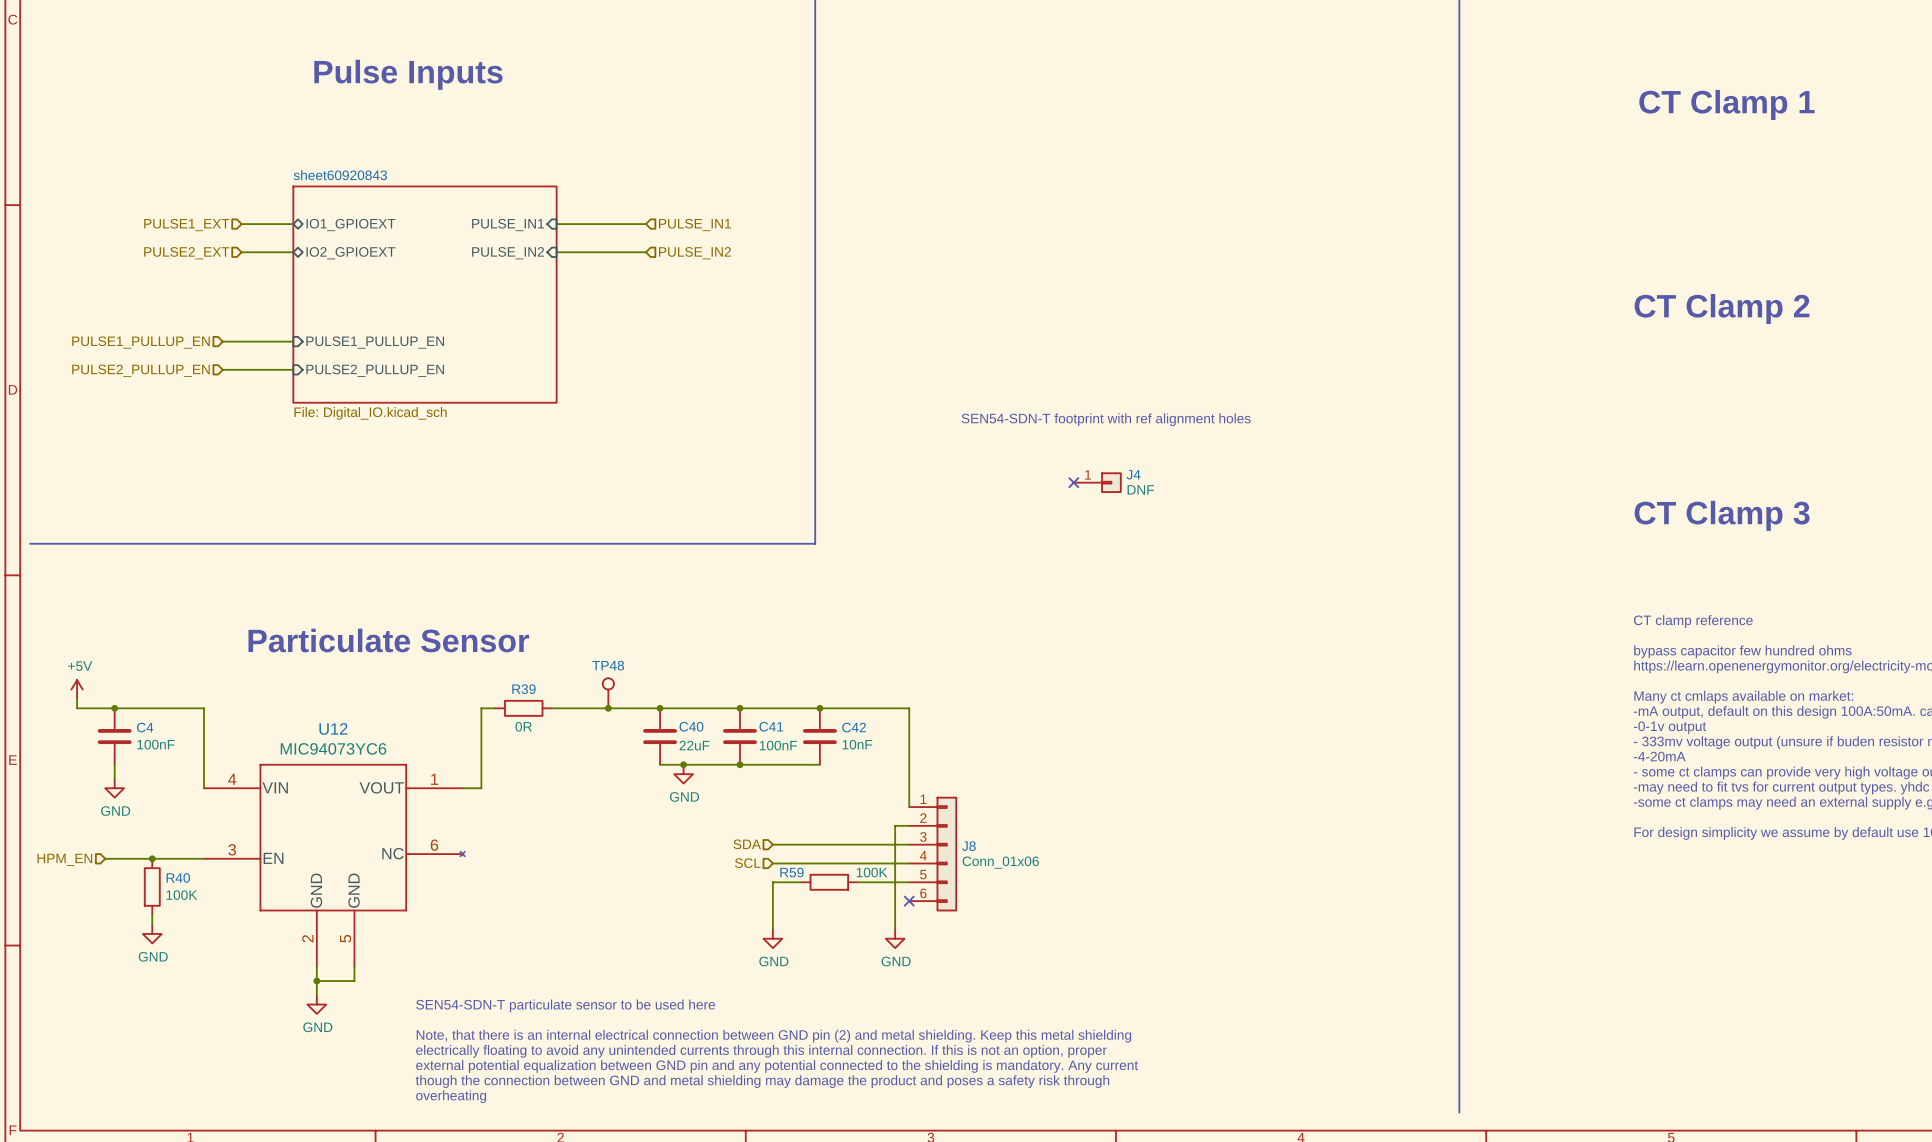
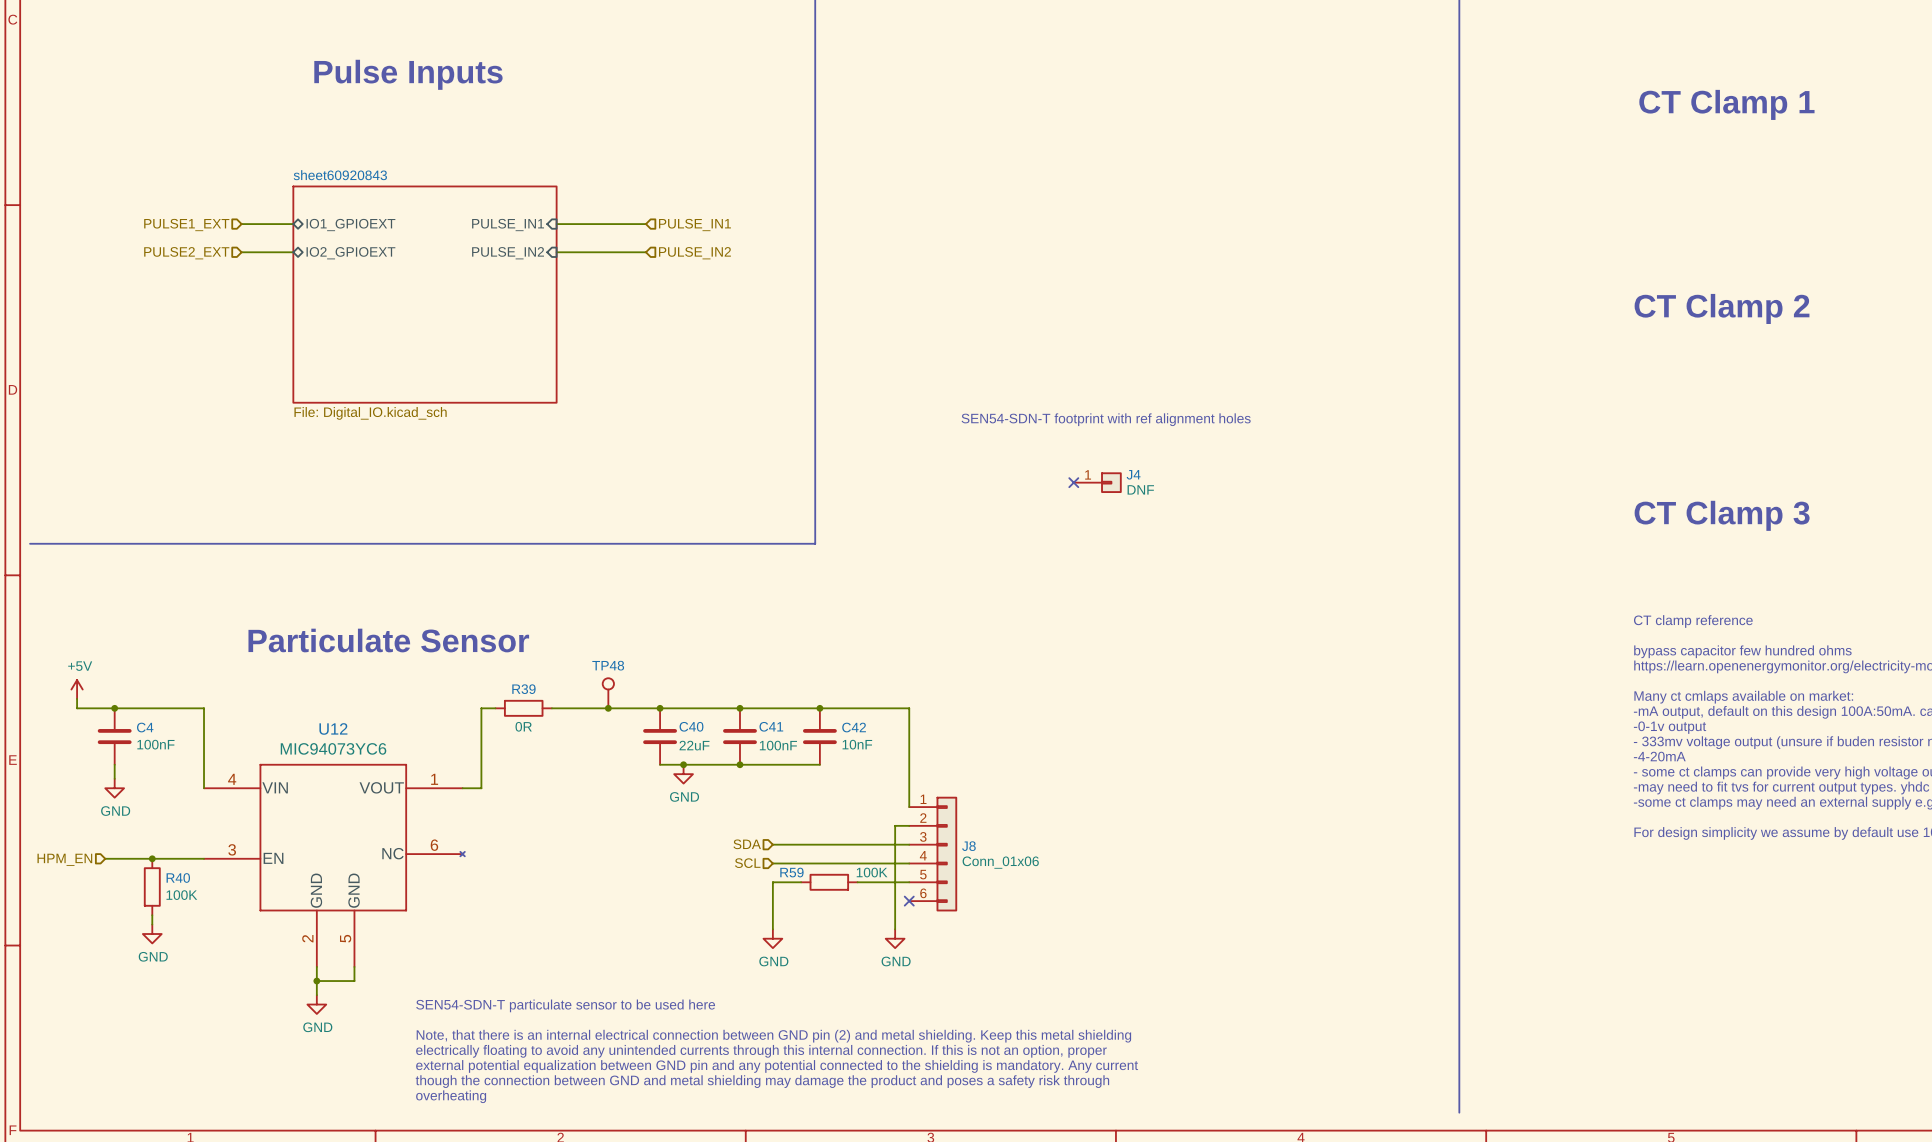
wire: (222, 341) (293, 341) -> none
hierarchical label: PULSE1_PULLUP_EN (140, 342) -> none
sheet pin: PULSE1_PULLUP_EN (375, 342) -> none
wire: (222, 369) (293, 369) -> none
hierarchical label: PULSE2_PULLUP_EN (140, 370) -> none
sheet pin: PULSE2_PULLUP_EN (375, 370) -> none

